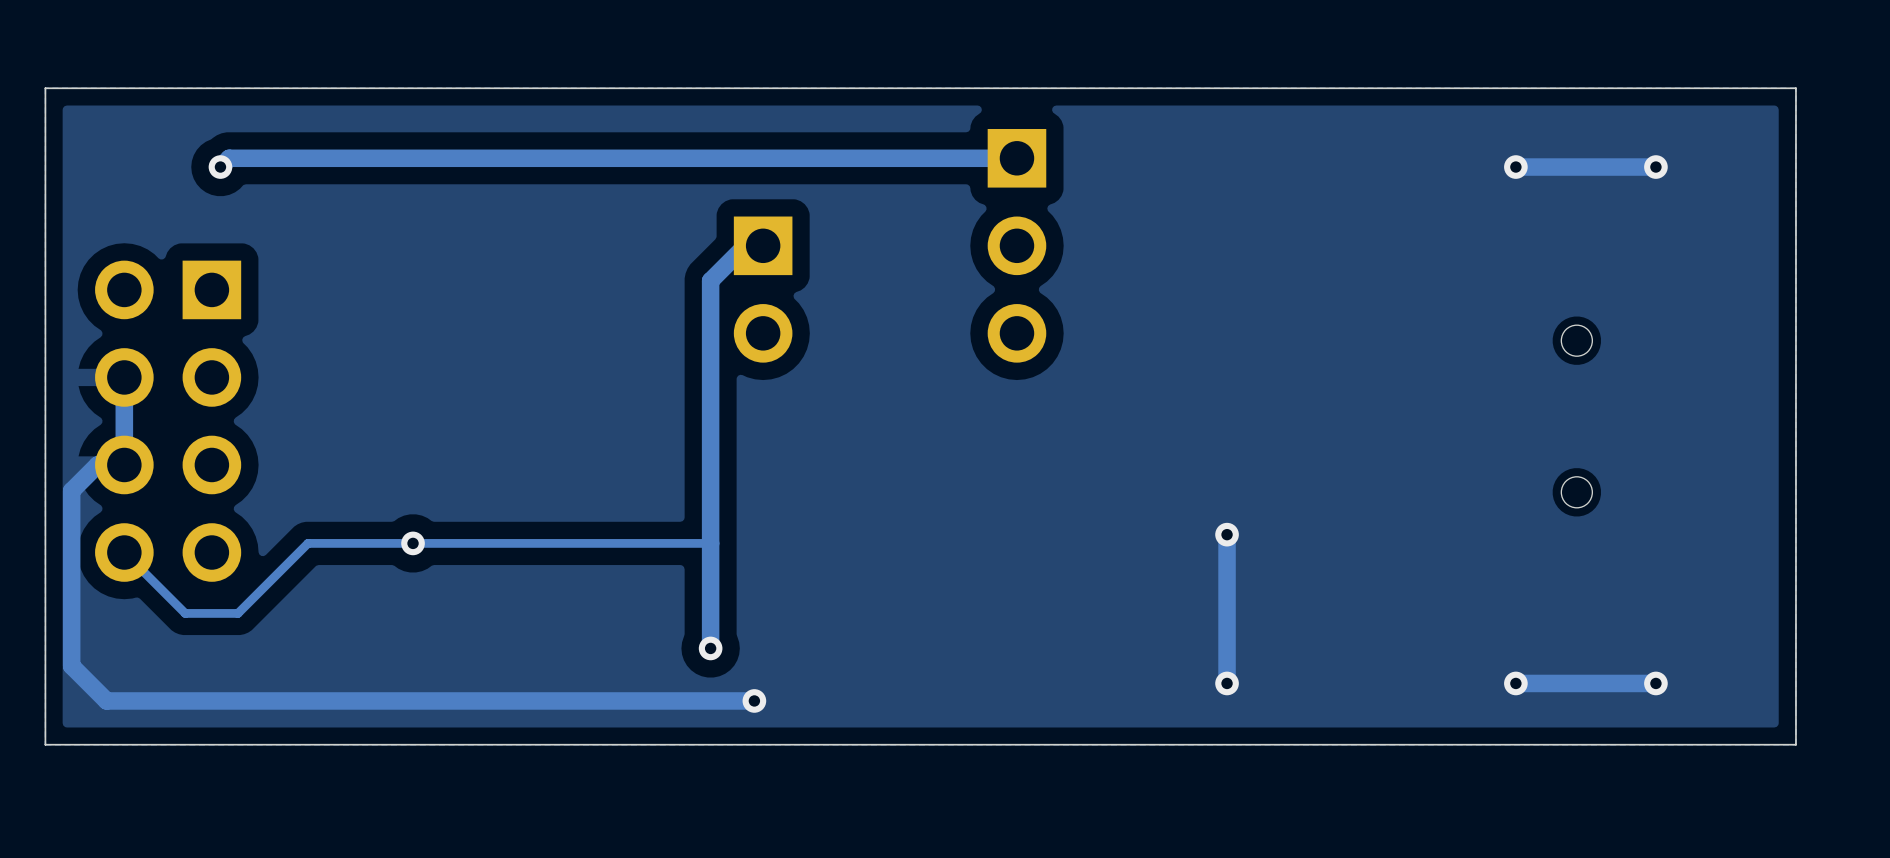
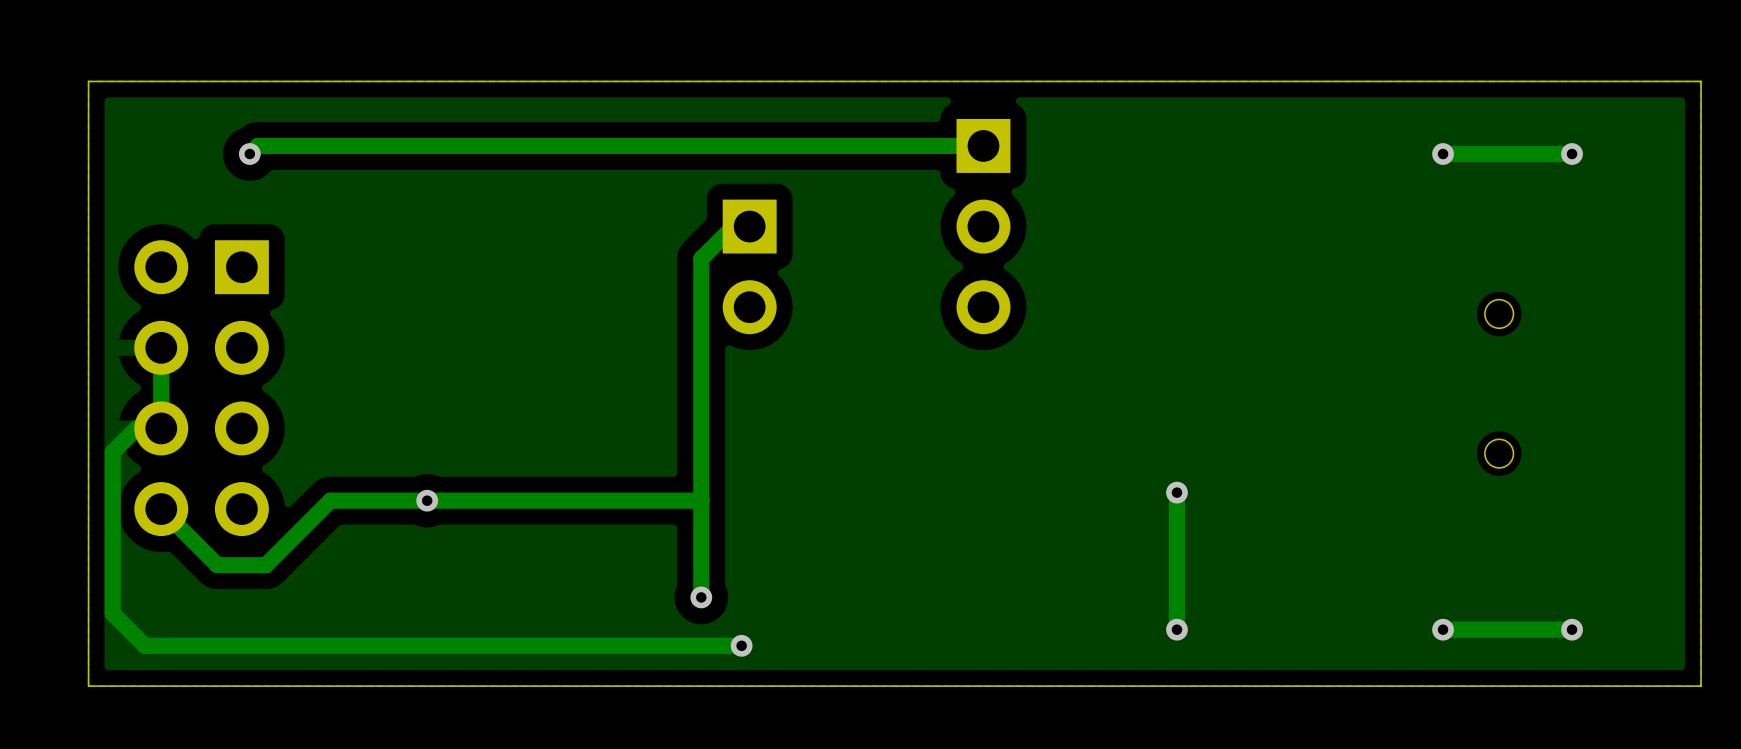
track width: thin (710, 543) (307, 543) (237, 613) (185, 613) (124, 552) -> thick (701, 500) (330, 500) (265, 565) (217, 565) (161, 509)

